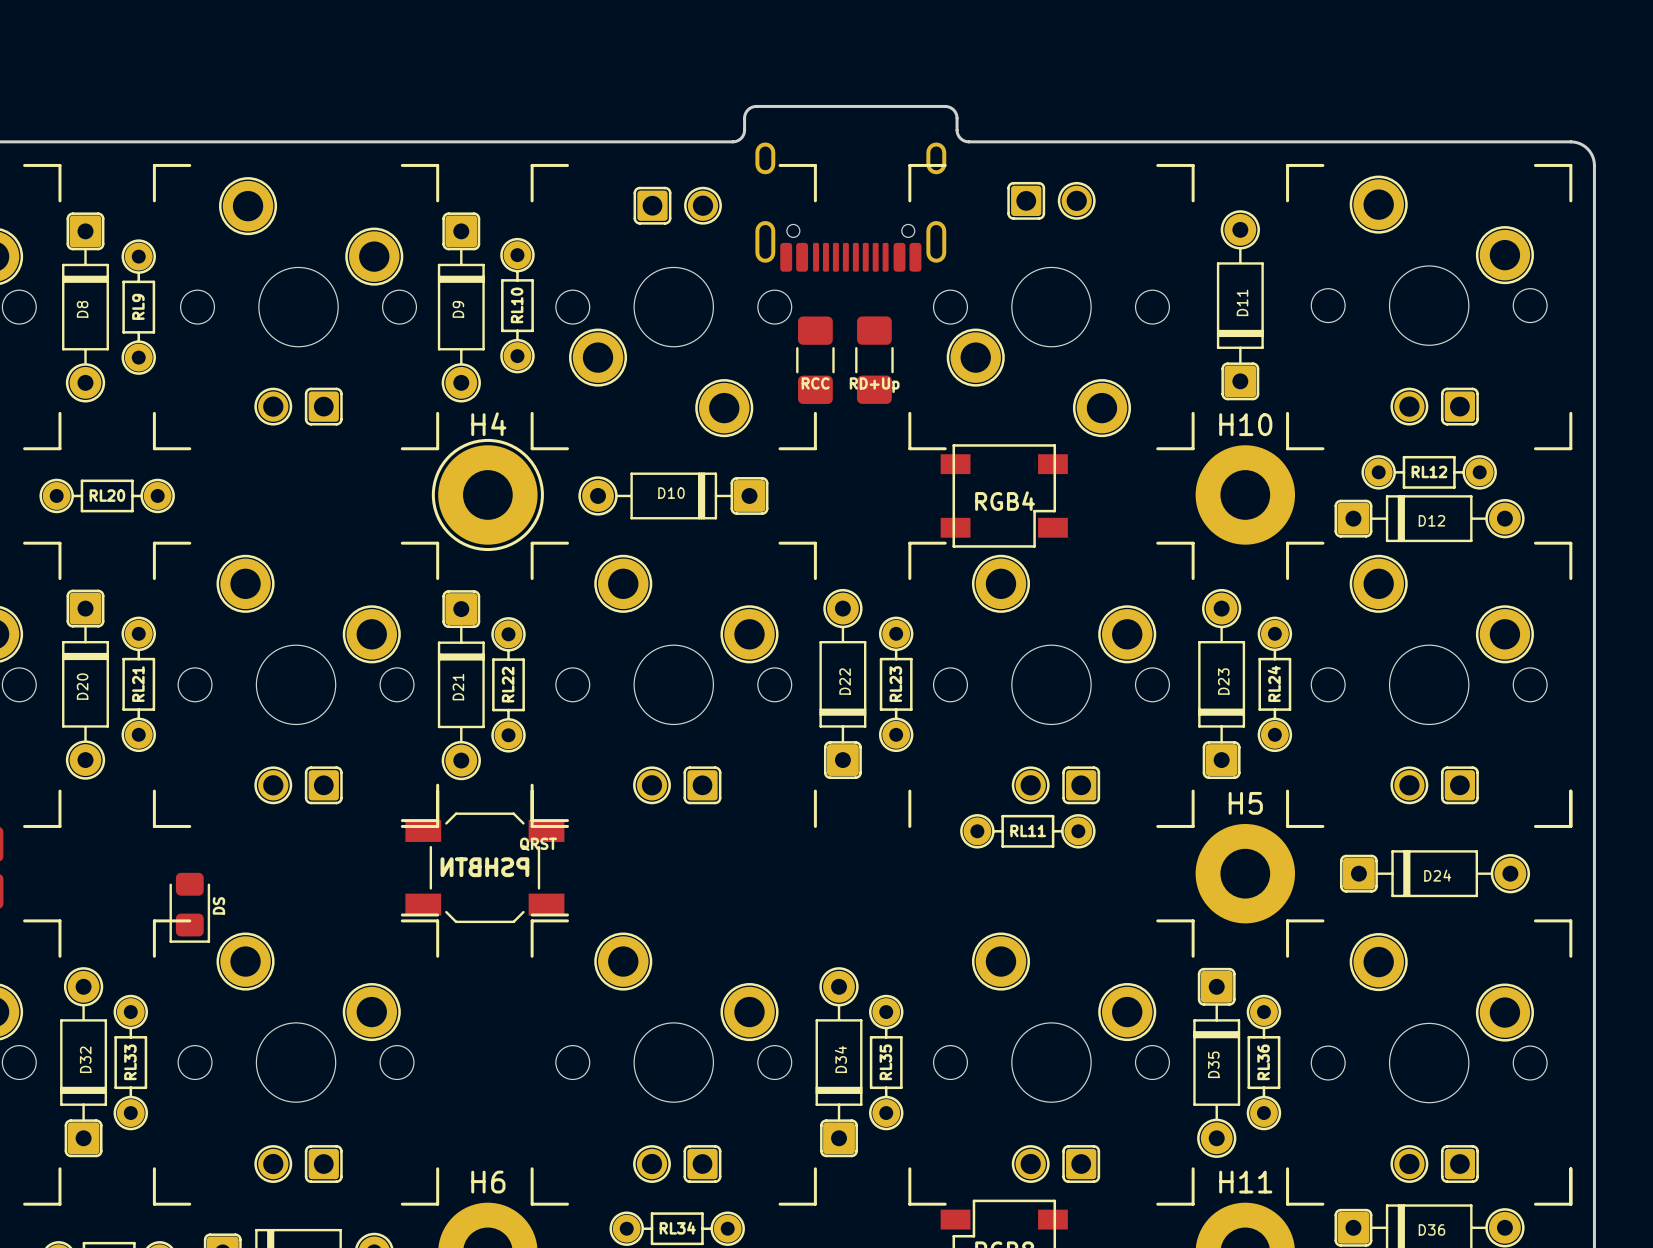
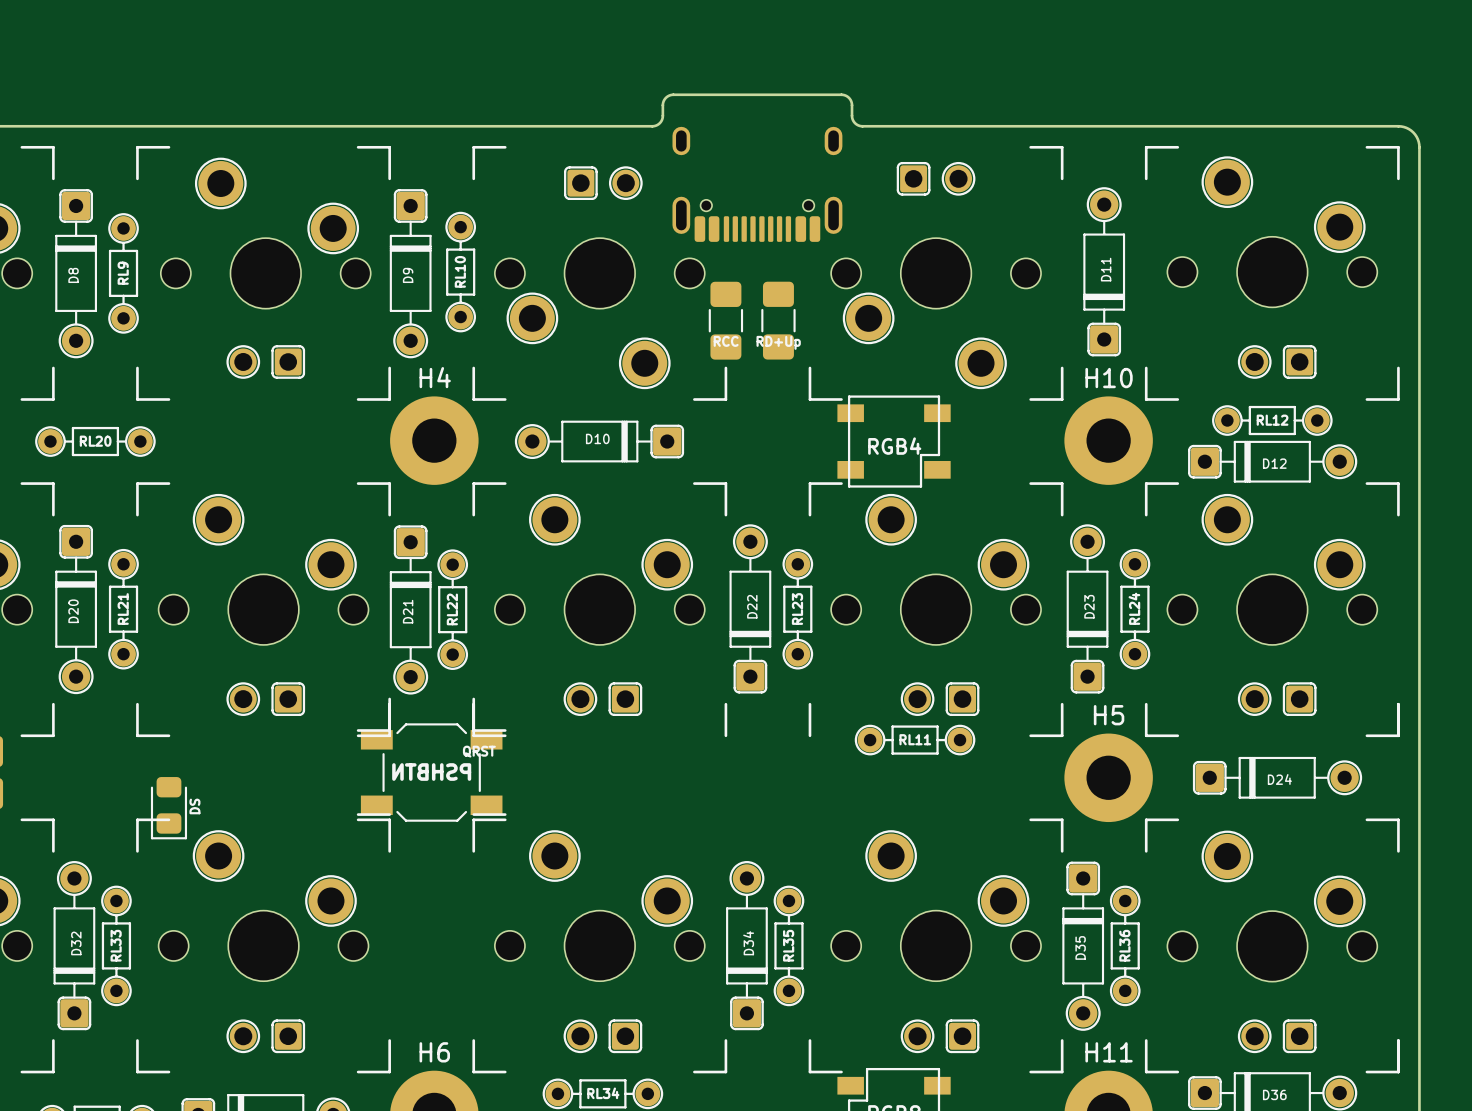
line: (779, 165) (815, 165) (815, 200) -> none
line: (945, 165) (909, 165) (909, 200) -> none
drawing: [431, 438, 544, 552] -> none

